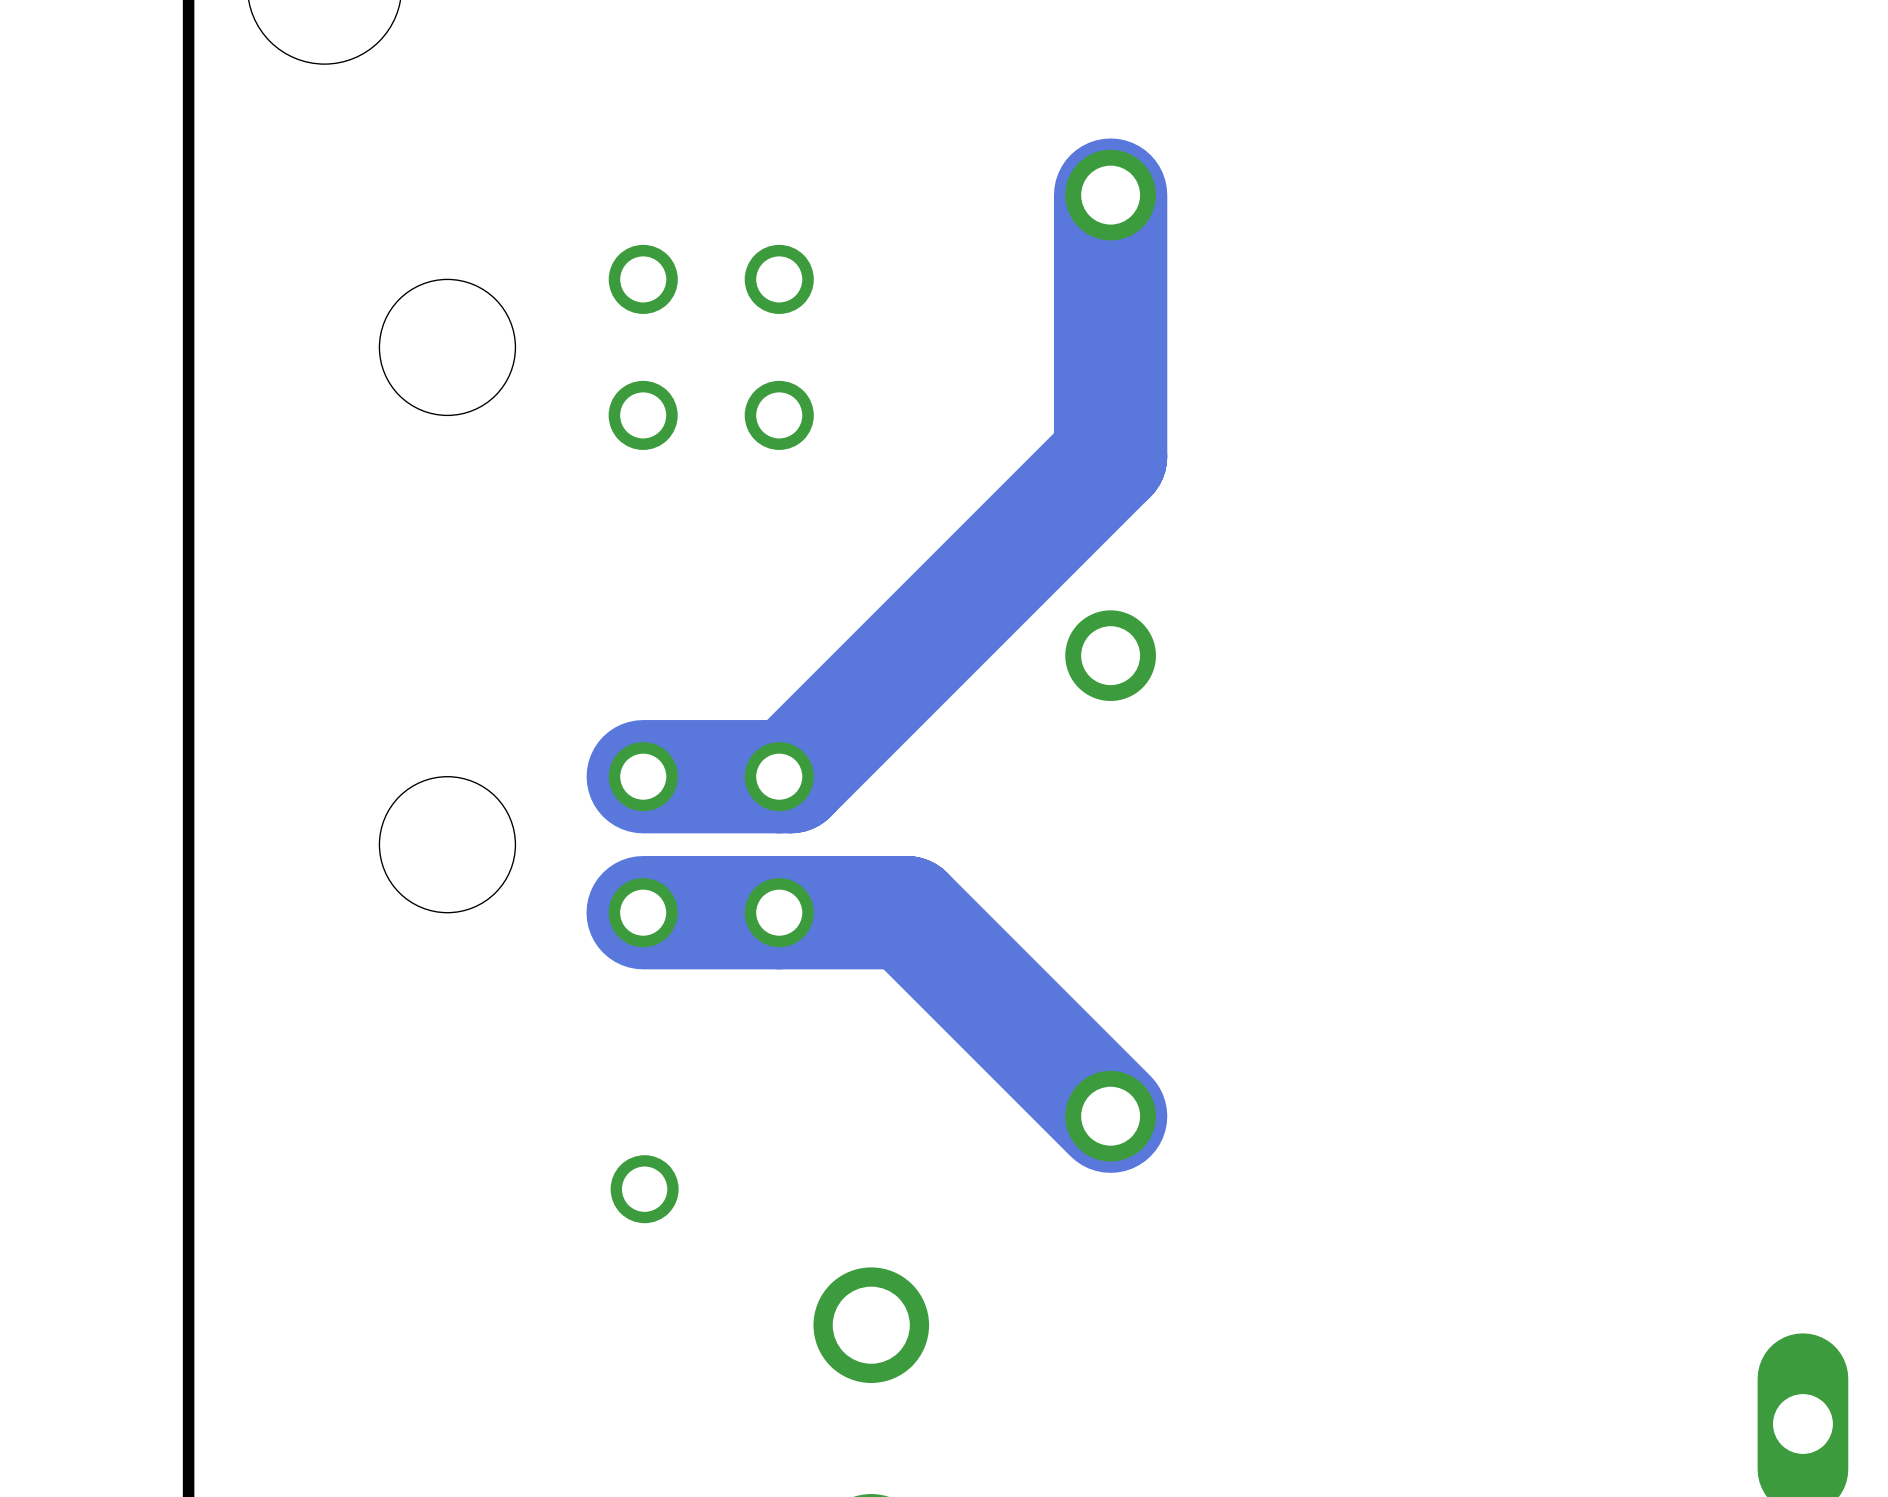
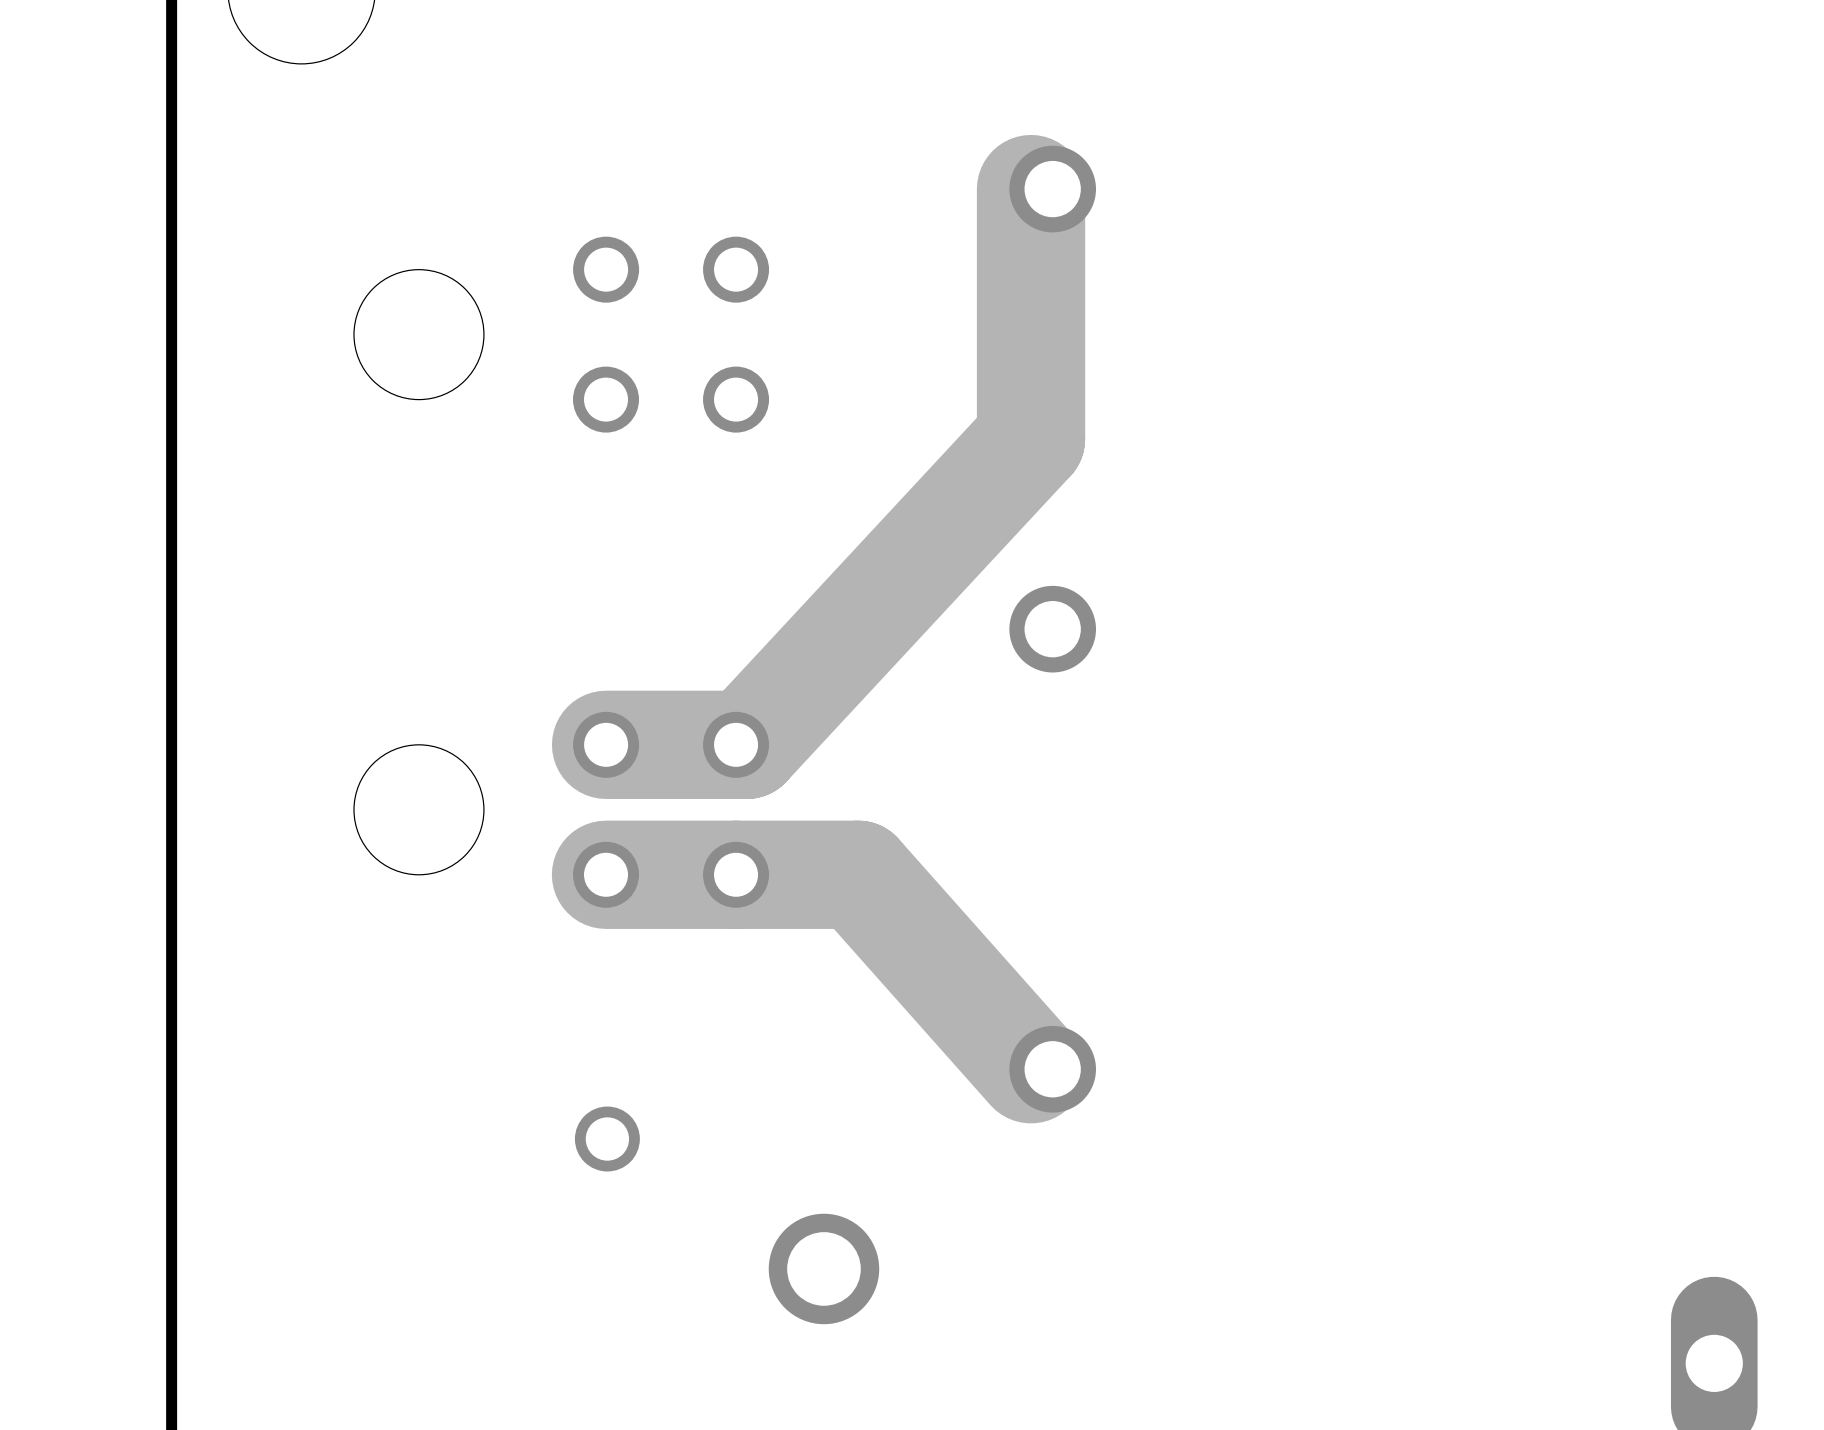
track: (1110, 195) (1110, 456) (790, 776) -> (1031, 189) (1031, 439) (746, 744)
track: (907, 912) (1110, 1116) -> (858, 874) (1031, 1069)

